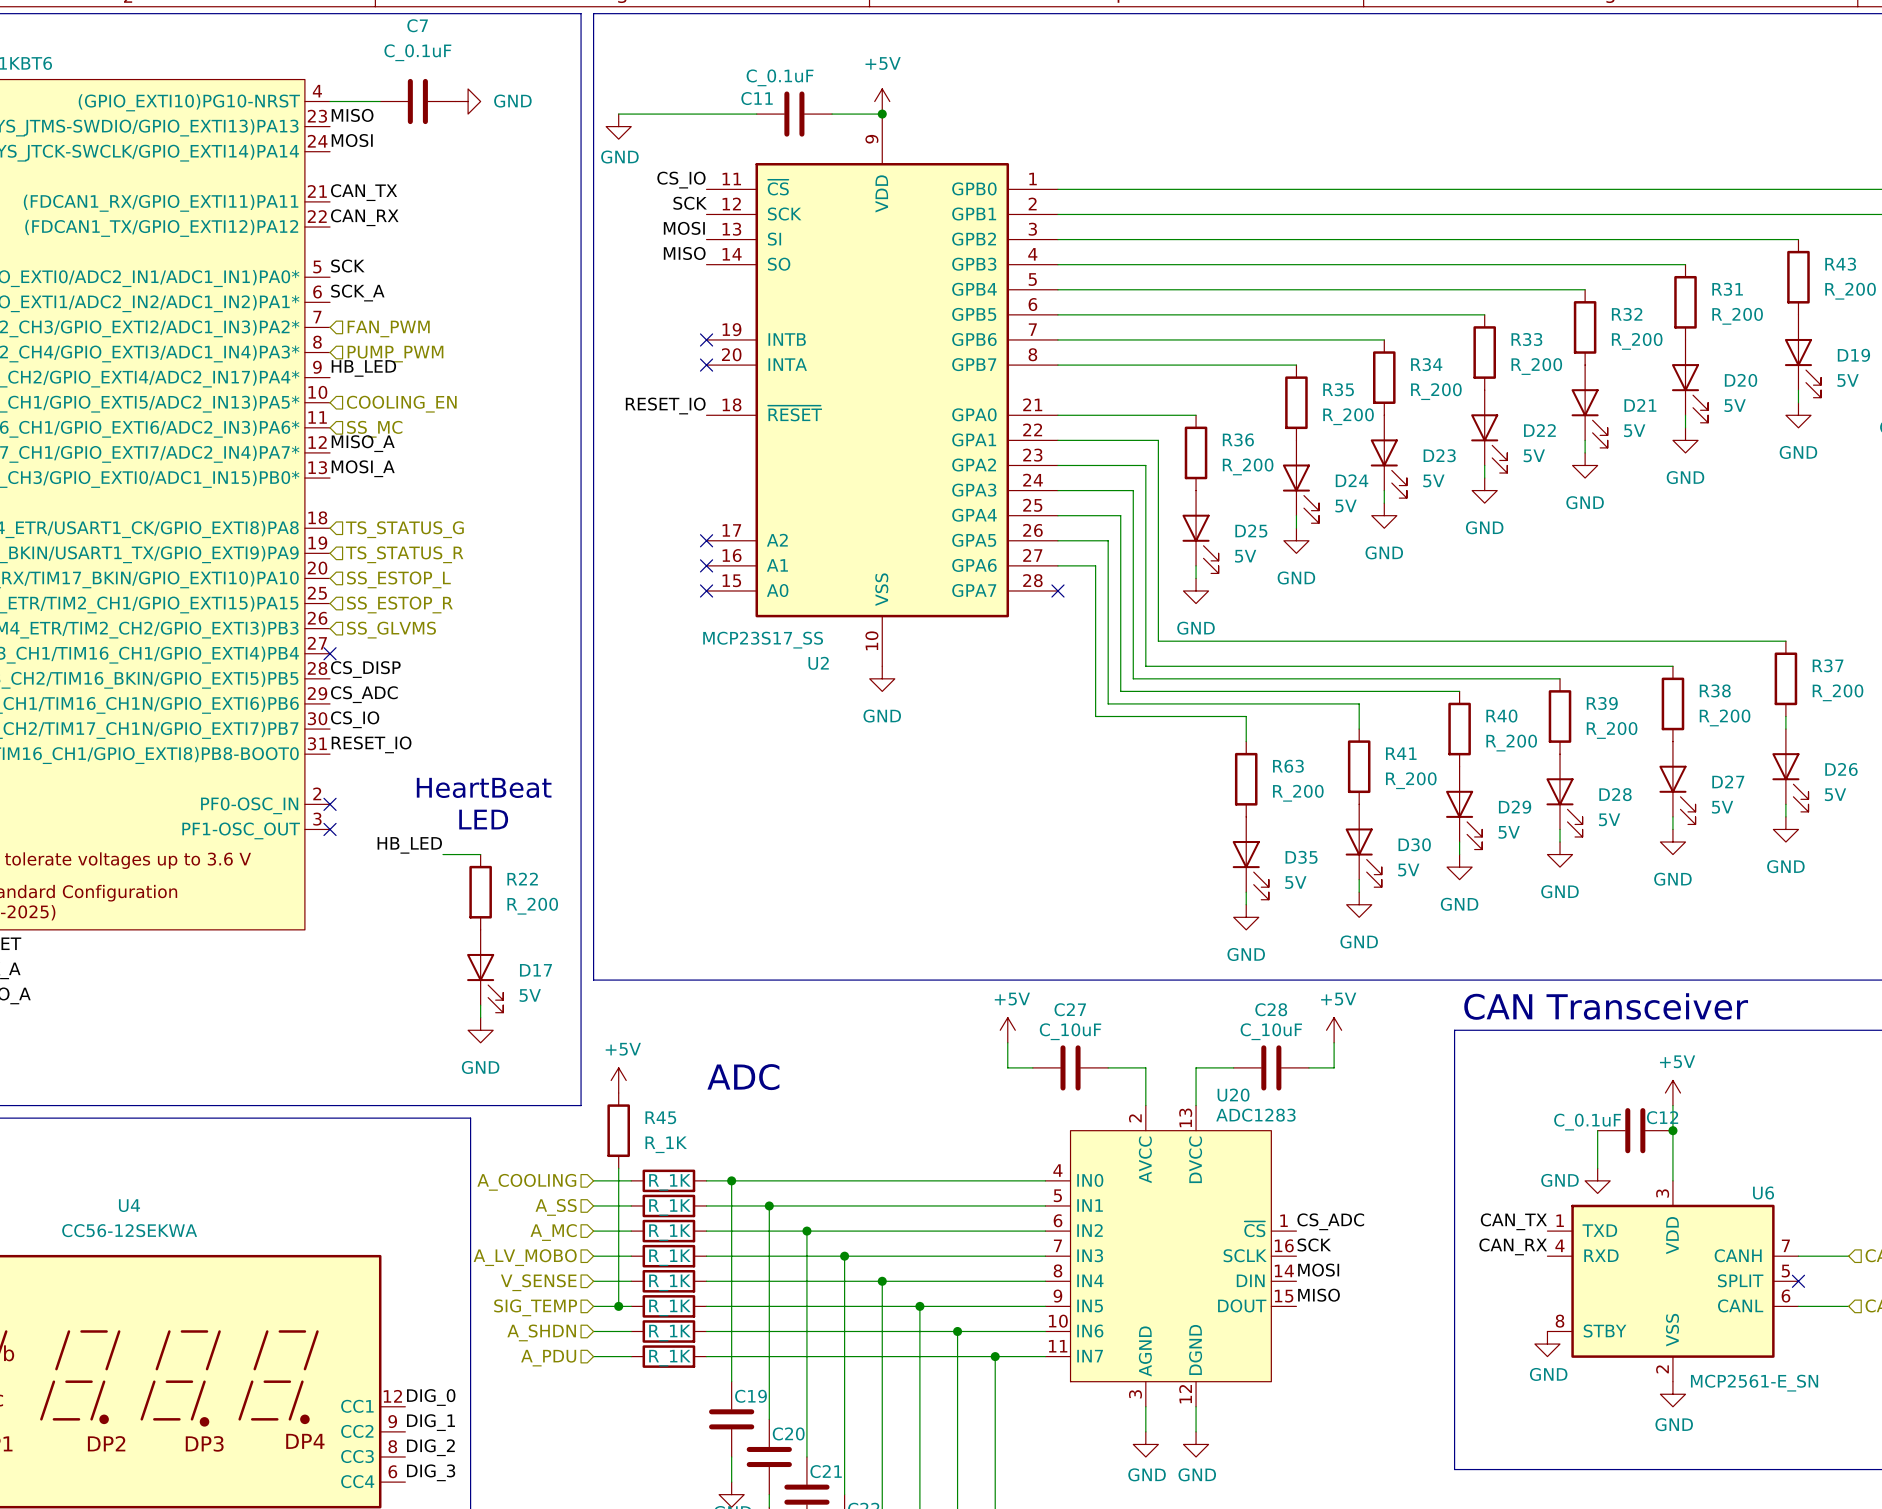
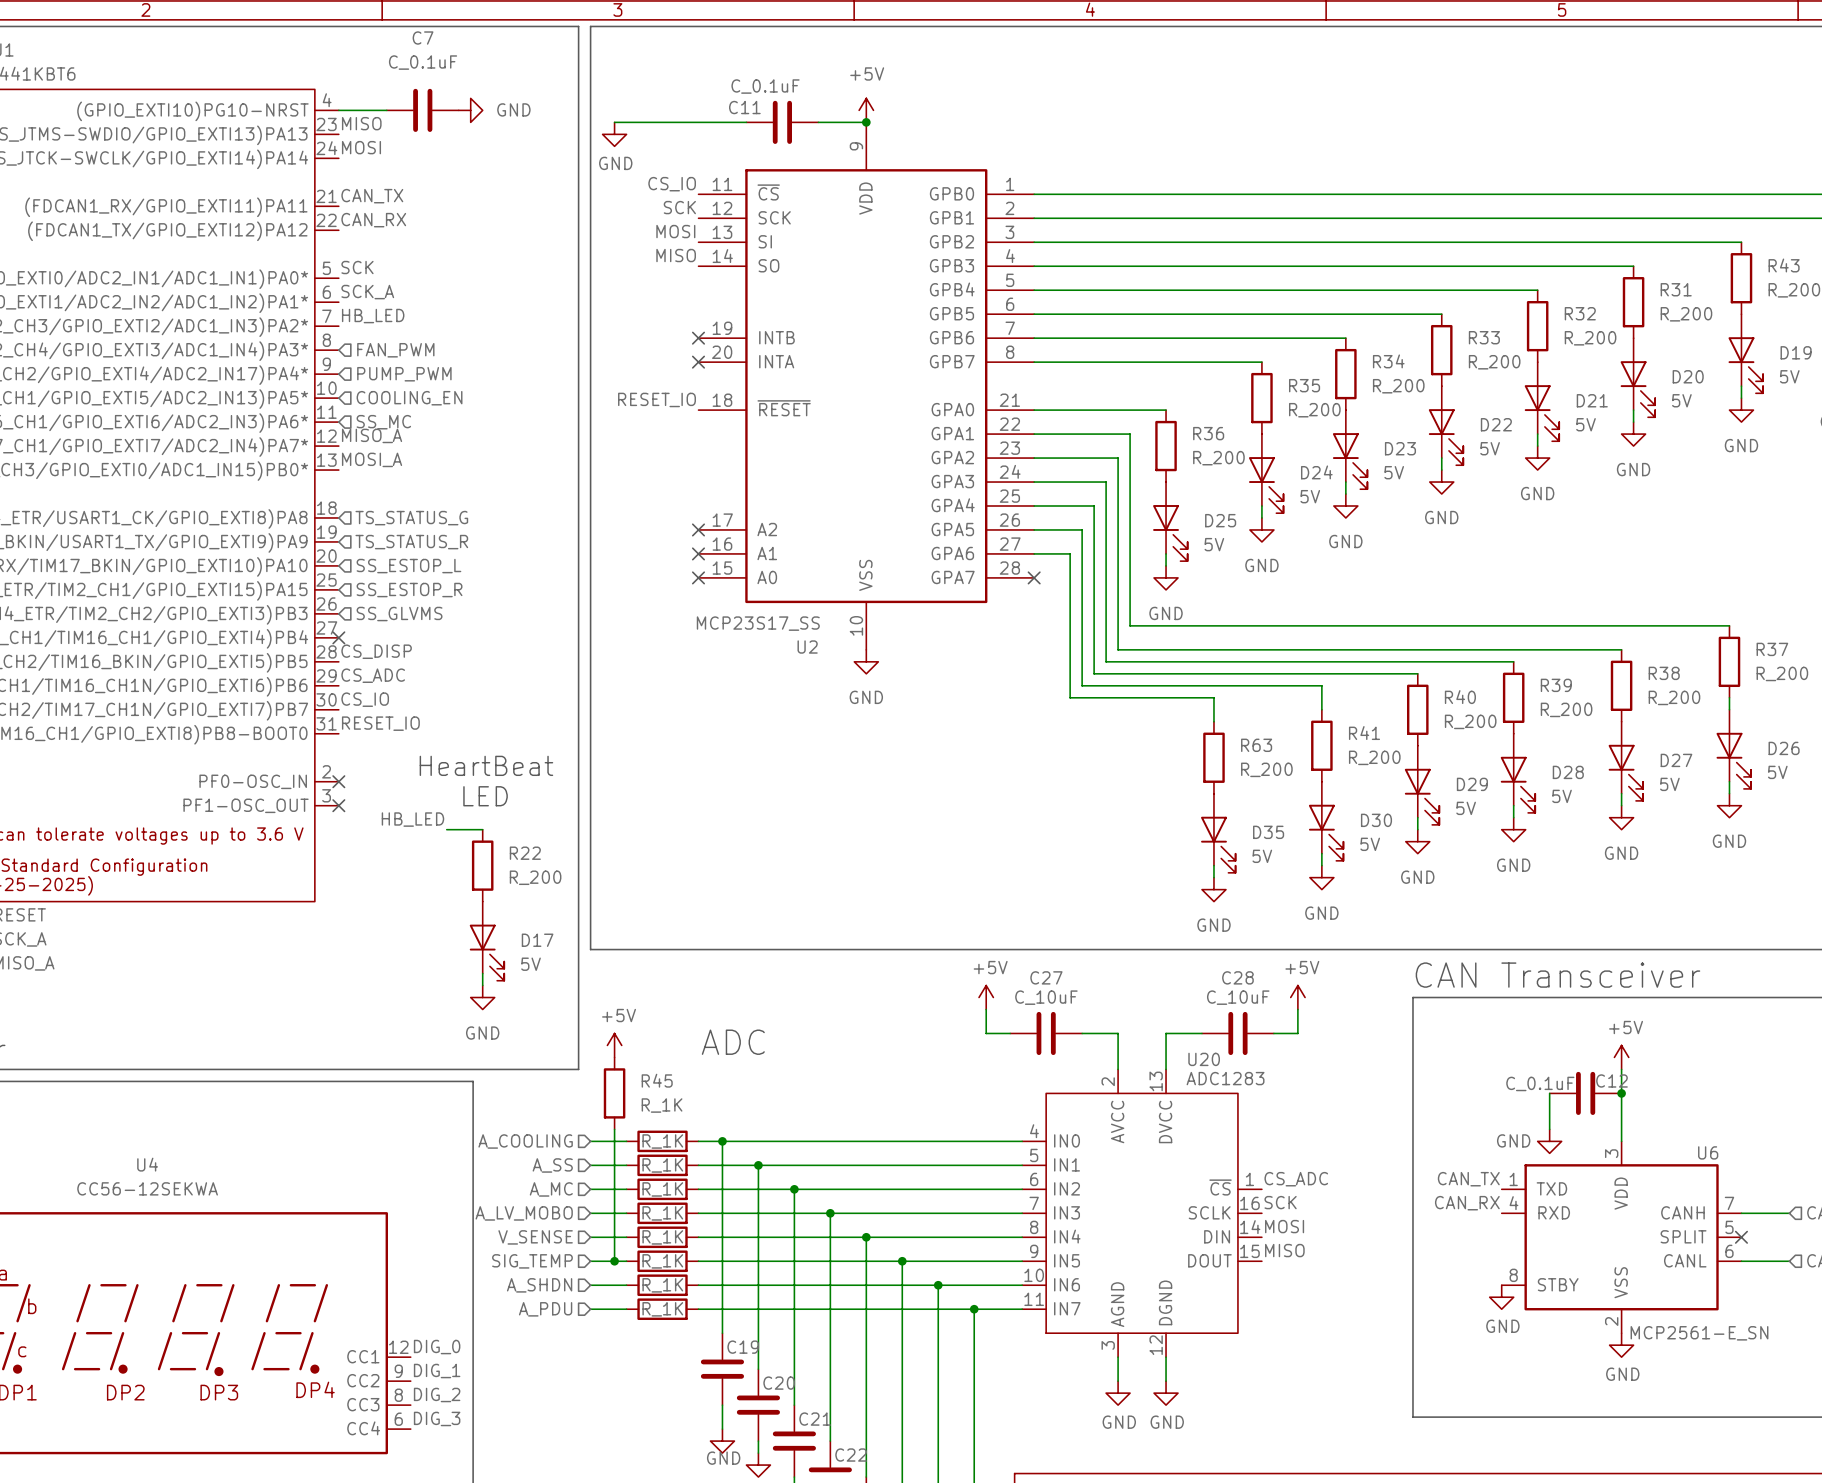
hierarchical label: FAN_PWM (388, 328) -> none
hierarchical label: PUMP_PWM (395, 354) -> FAN_PWM (395, 350)
label position: HB_LED (363, 368) -> HB_LED (373, 316)
hierarchical label: none -> PUMP_PWM (404, 374)

